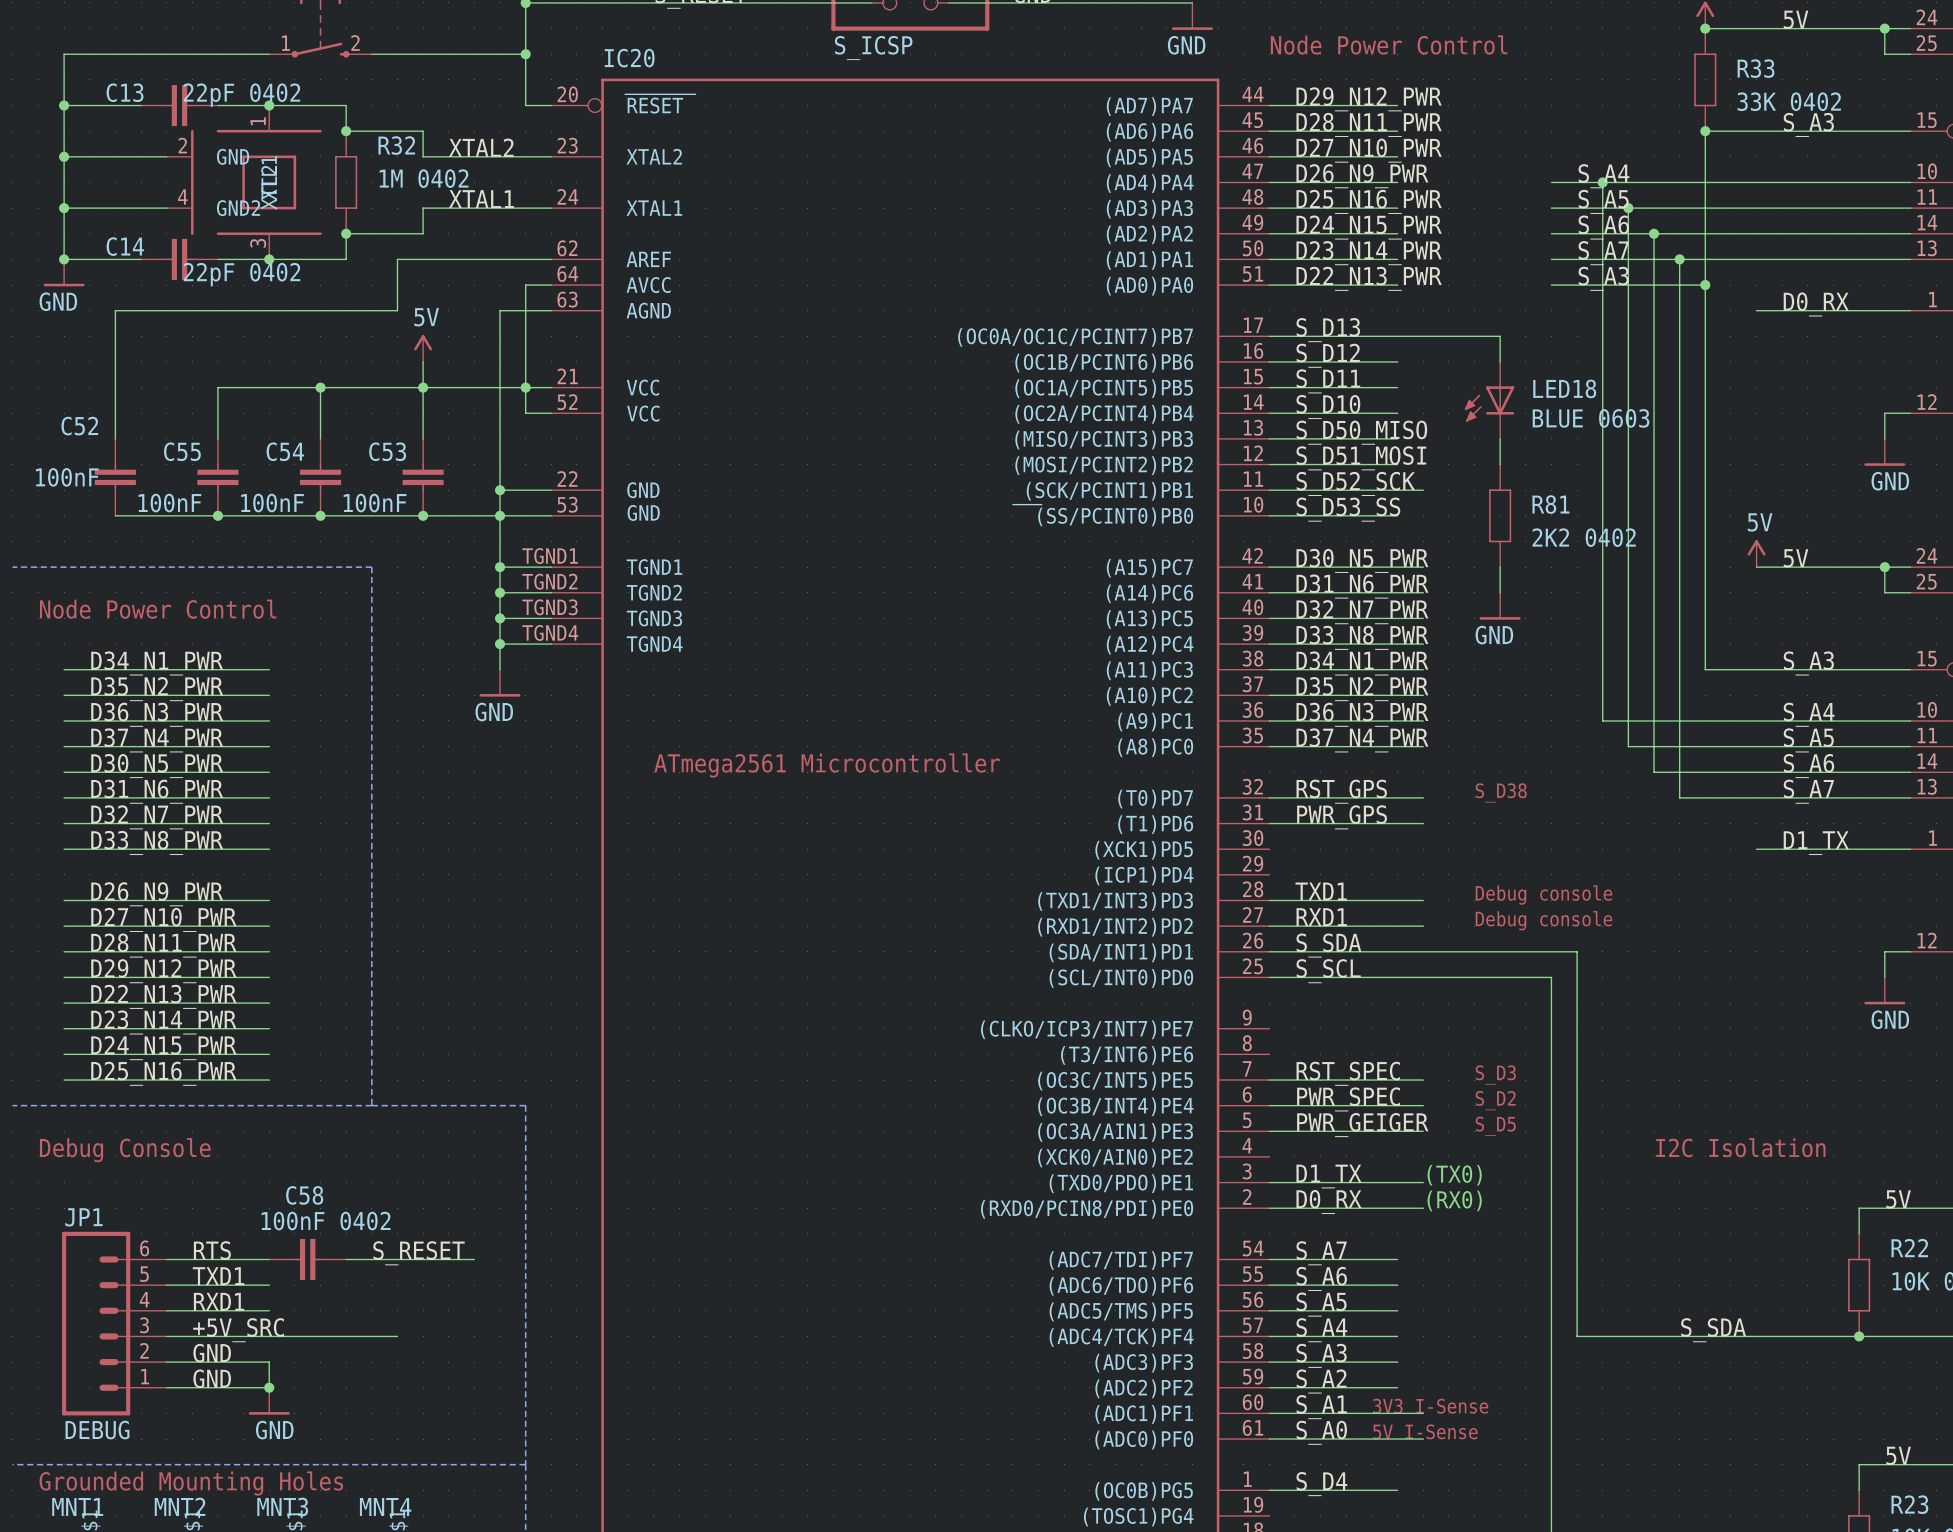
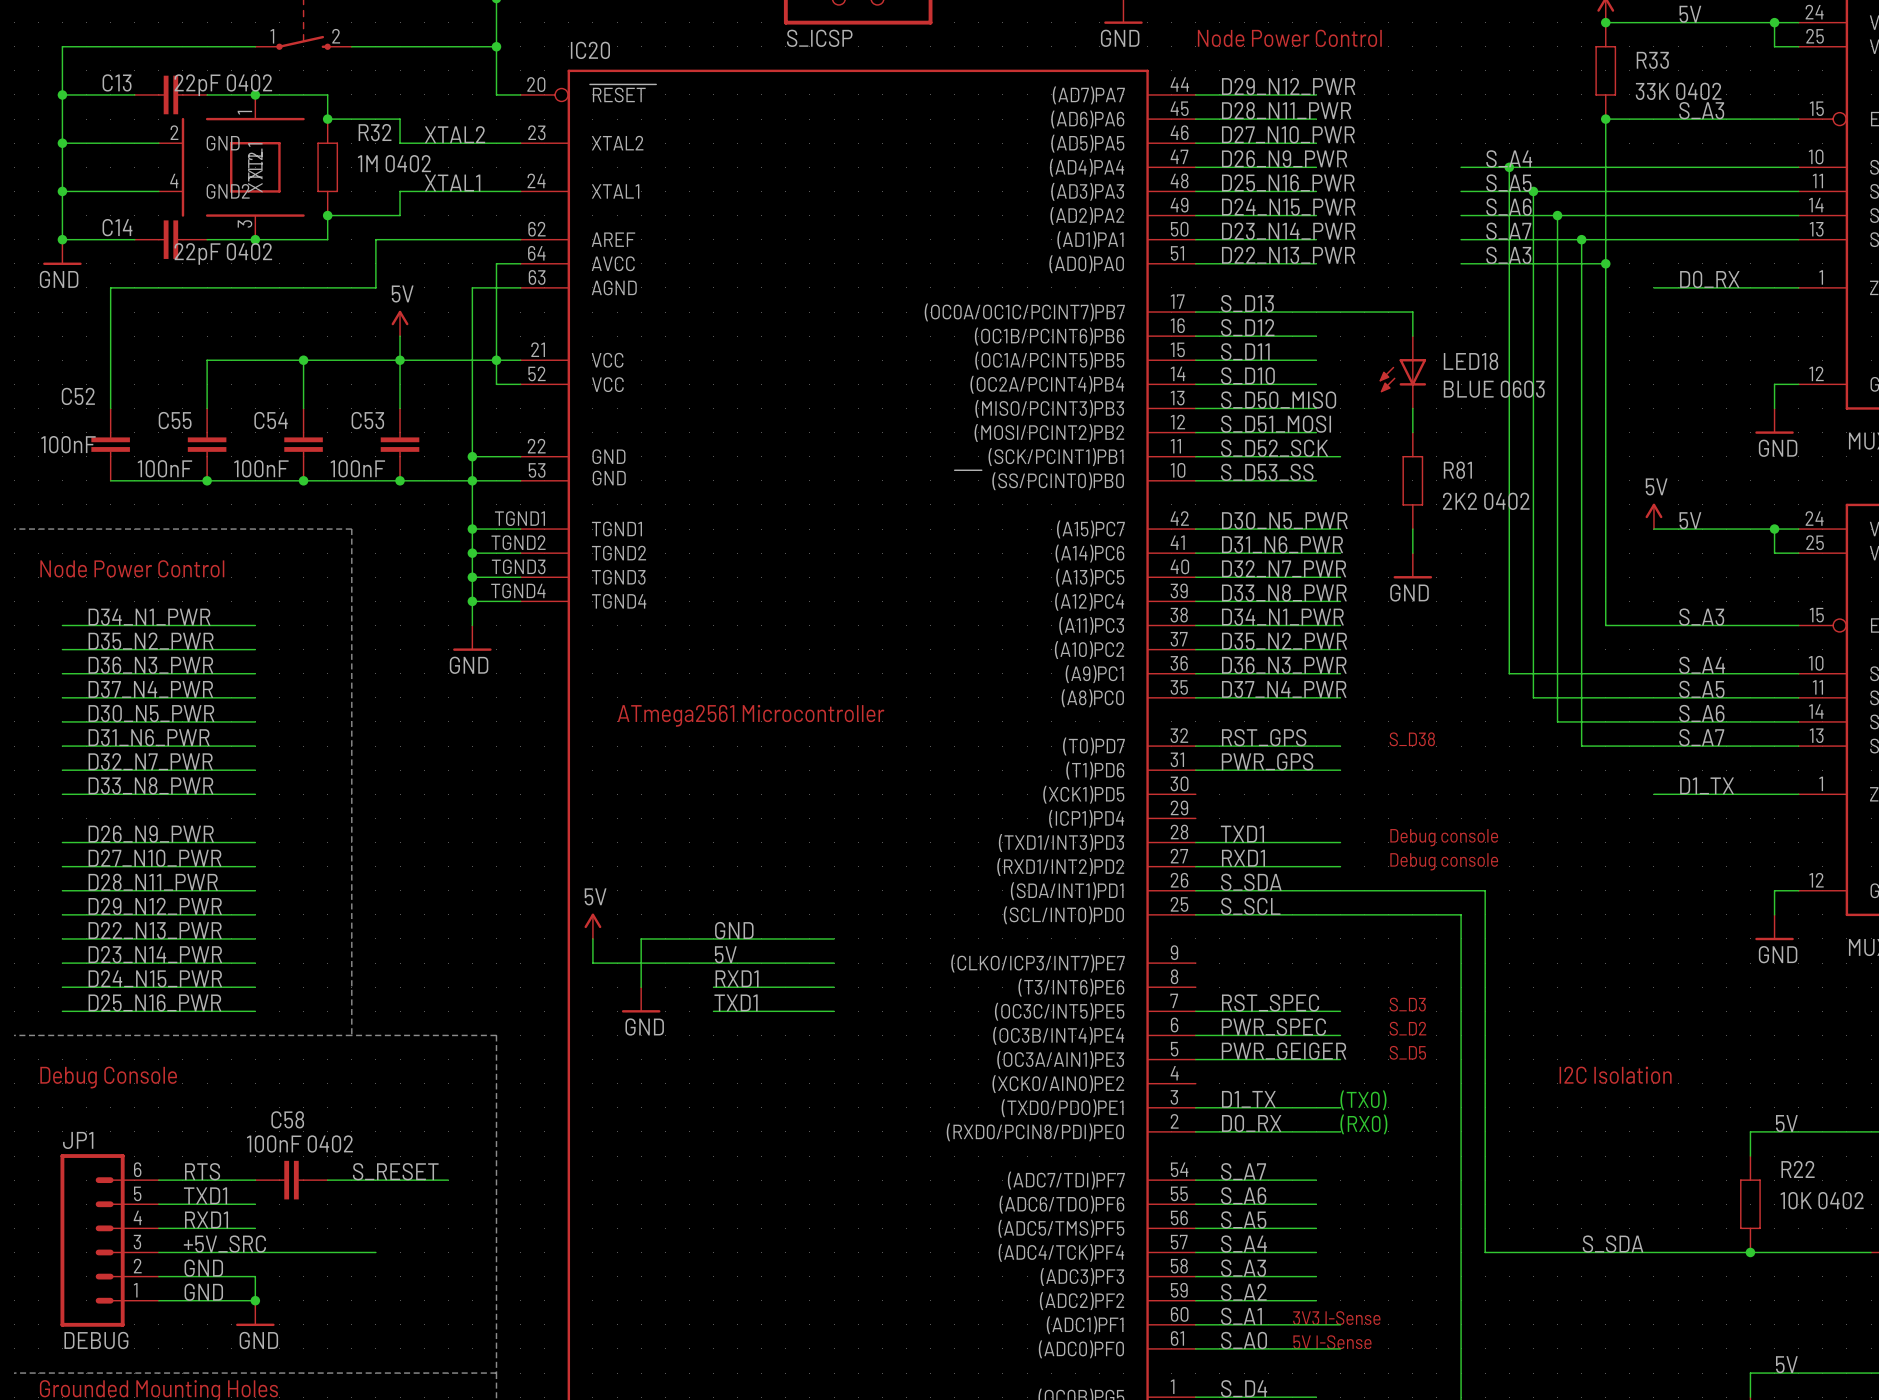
power symbol: none -> 5V (592, 926)
label: none -> GND (734, 930)
wire: none -> (592, 938) (592, 963) (834, 963)
wire: none -> (834, 938) (641, 938) (641, 987)
label: none -> 5V (725, 954)
label: none -> RXD1 (737, 978)
wire: none -> (713, 987) (834, 987)
power symbol: none -> GND (641, 999)
label: none -> TXD1 (736, 1002)
wire: none -> (713, 1011) (834, 1011)

